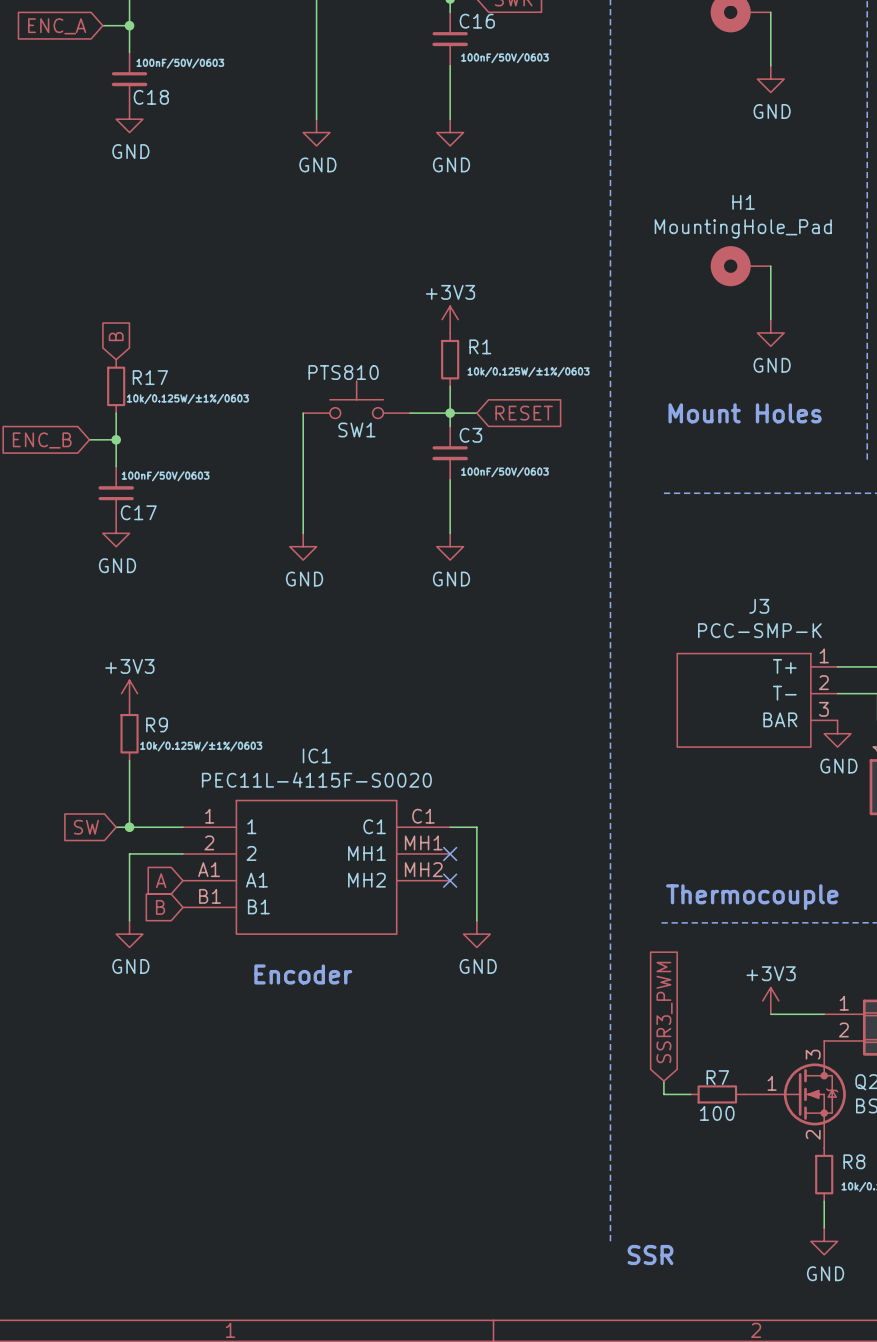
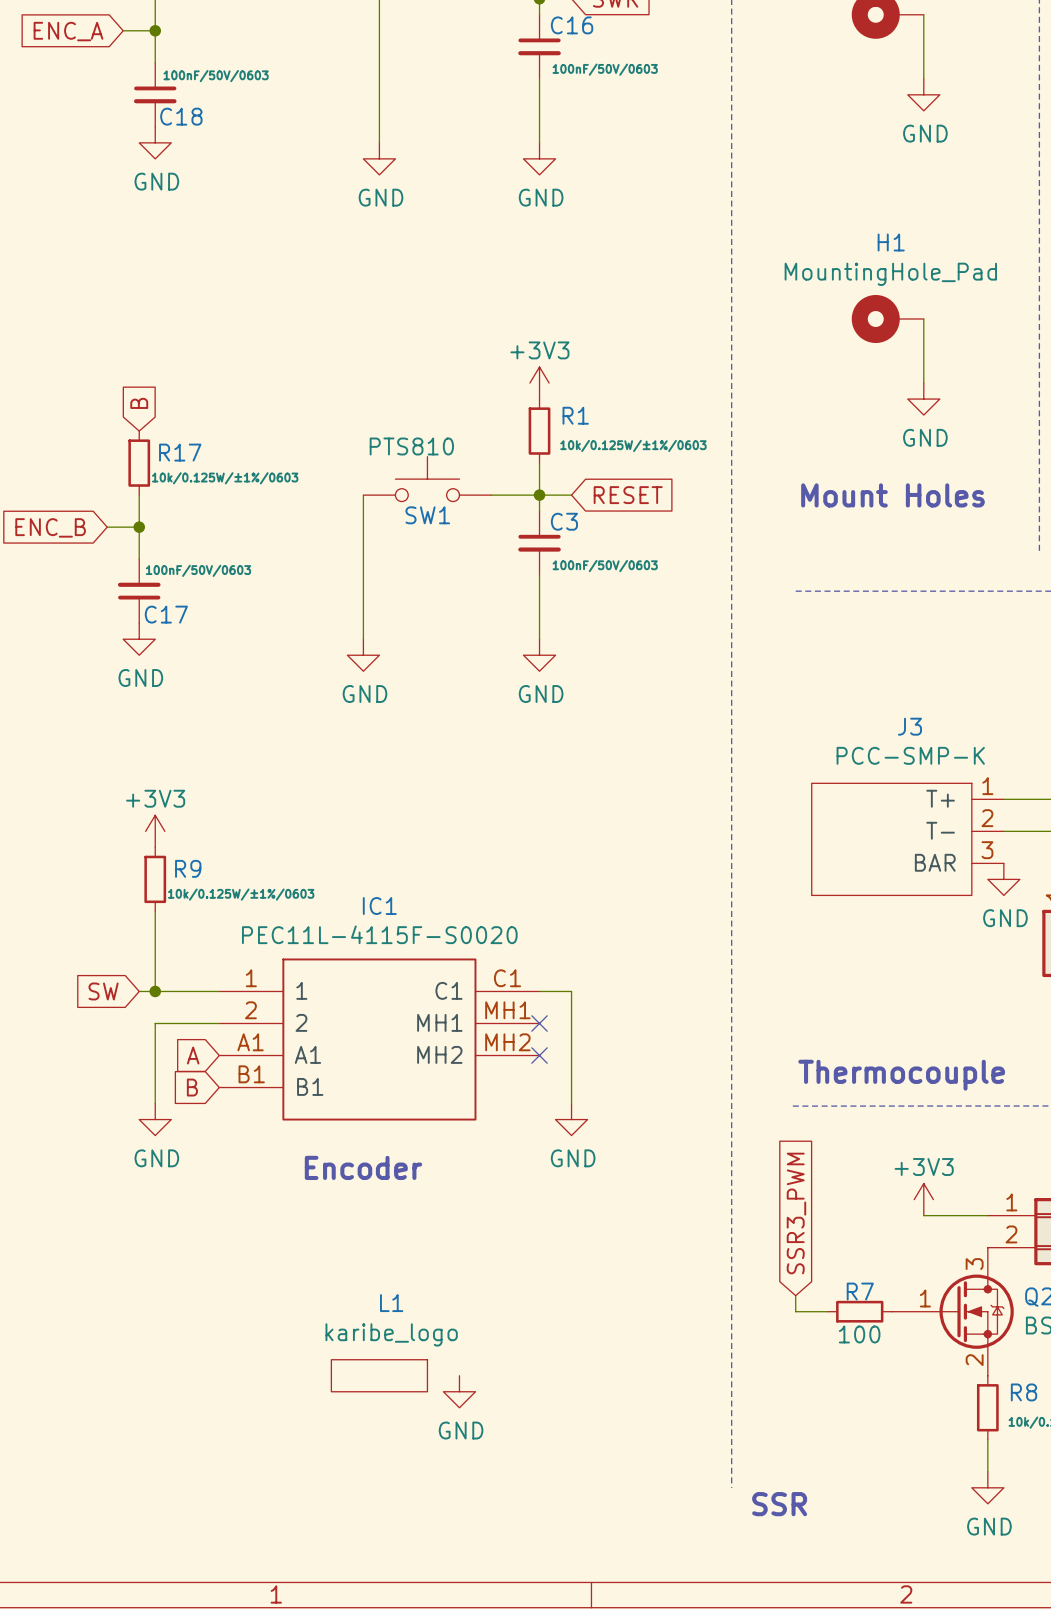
L1: none -> karibe_logo (379, 1375)
power symbol: none -> GND (459, 1391)

